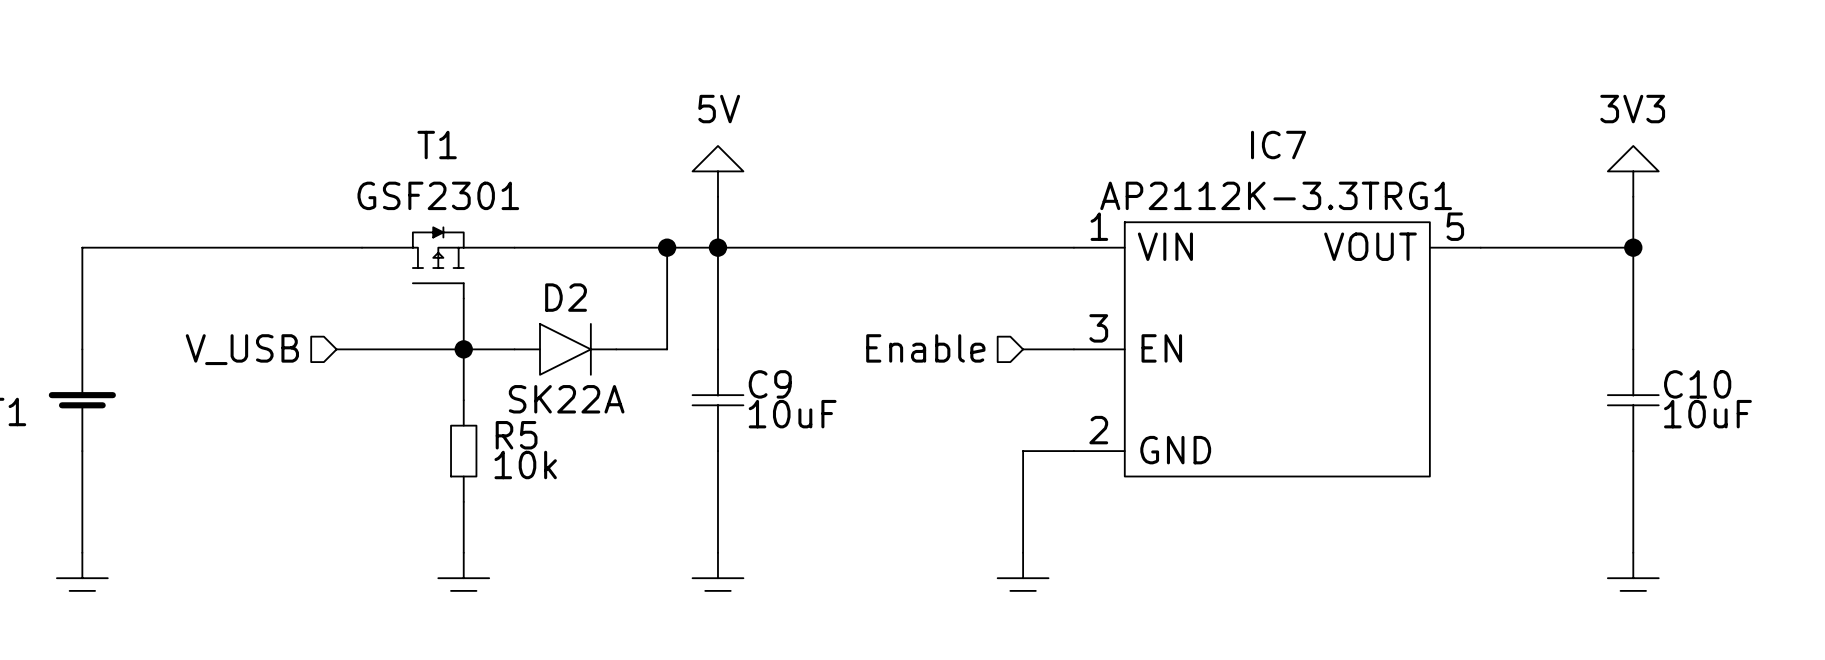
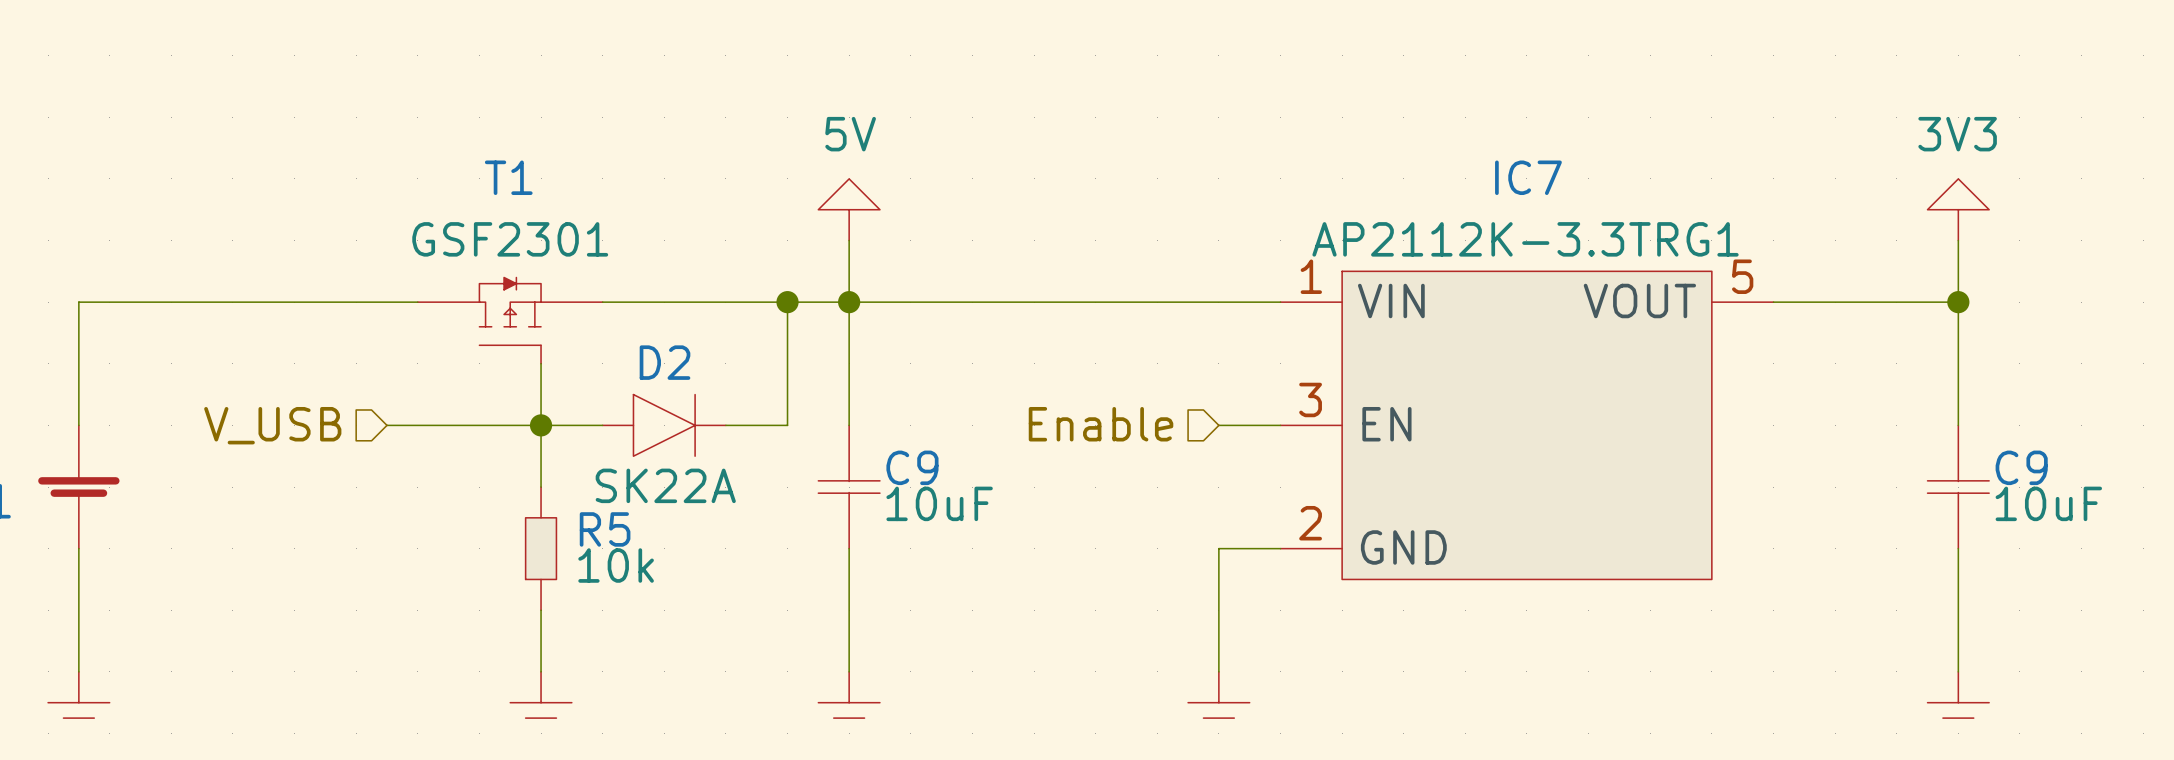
C10 name: C10 (1697, 384) -> C9 (2021, 467)

